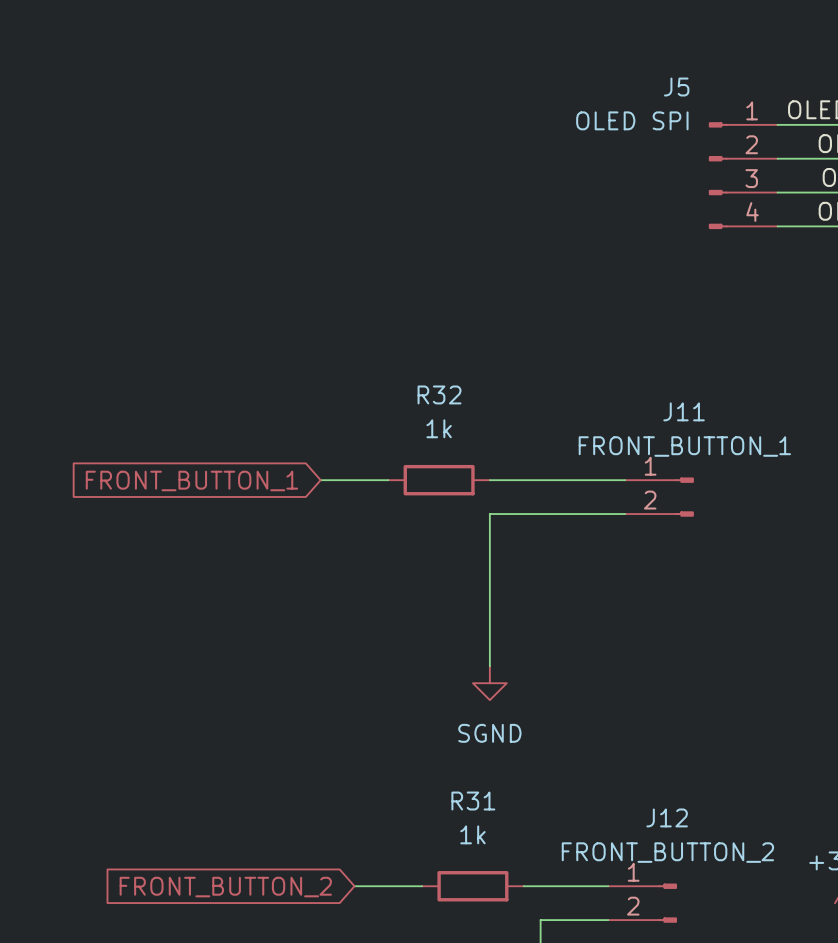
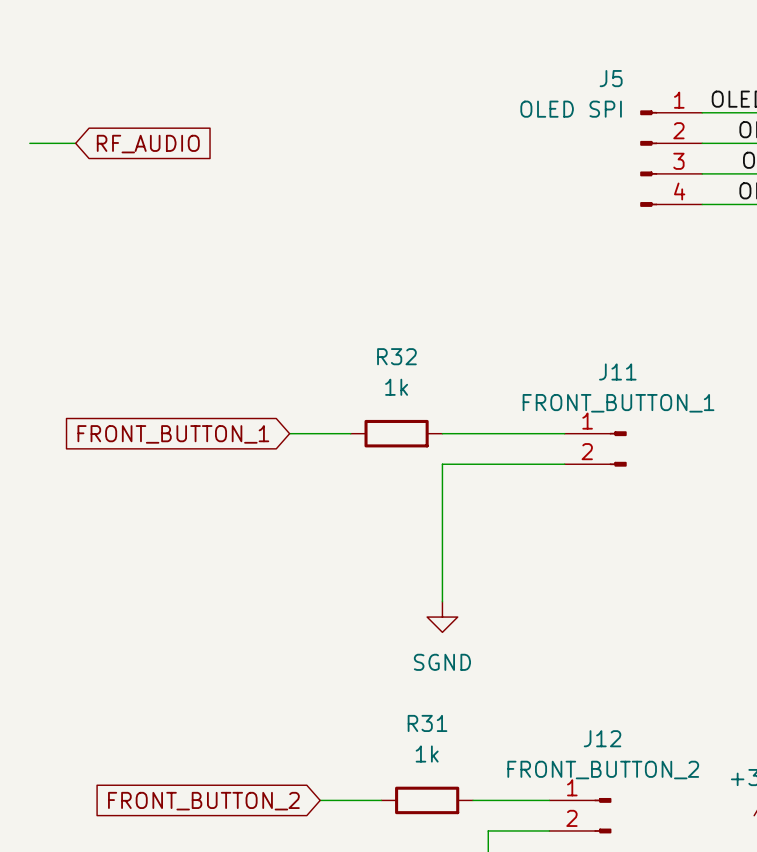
wire: none -> (29, 143) (75, 143)
global label: none -> RF_AUDIO (148, 144)

